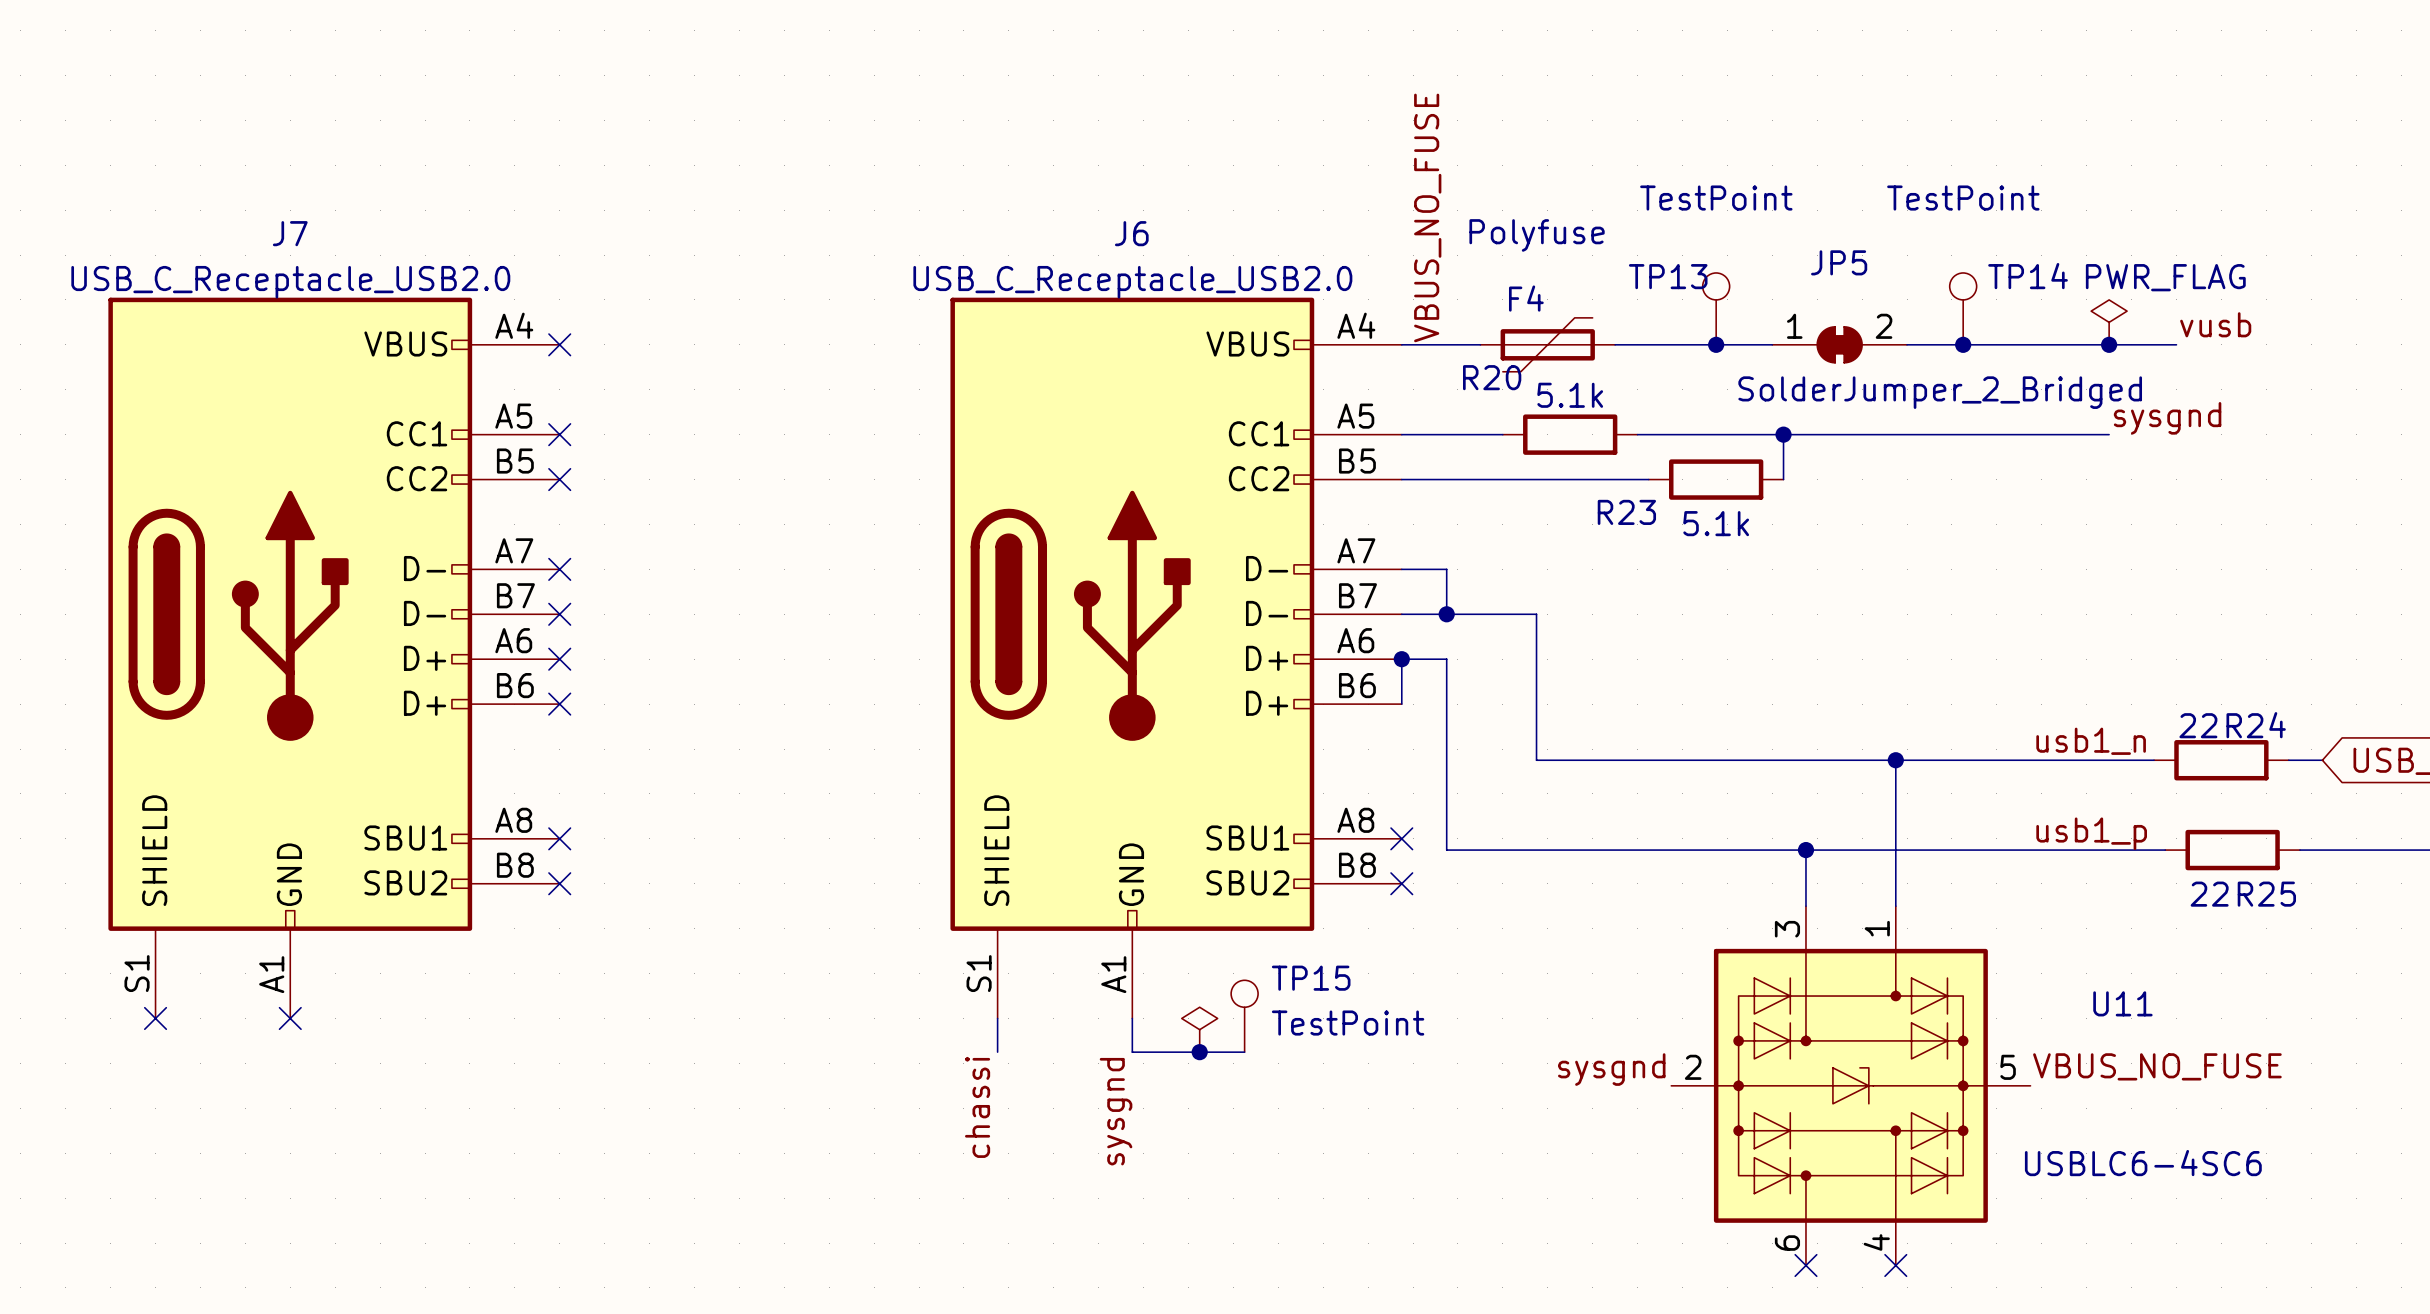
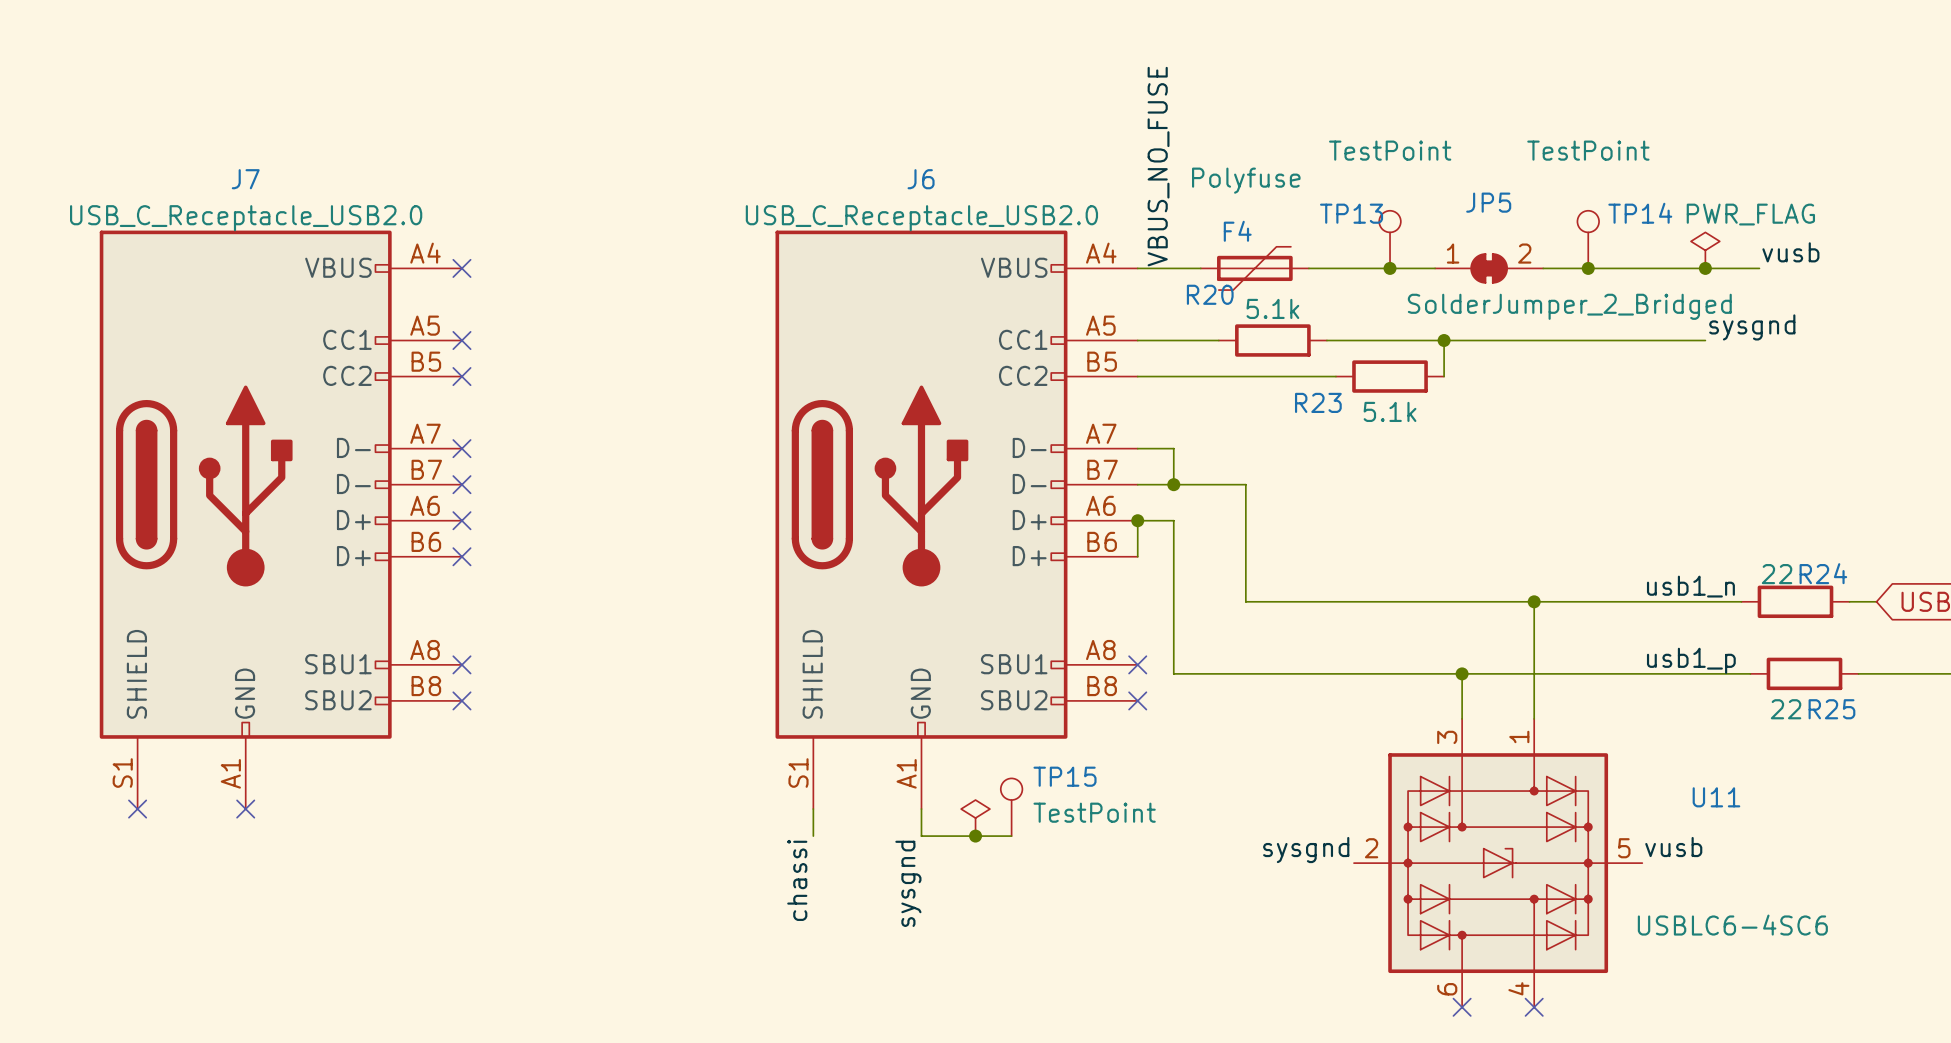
label: VBUS_NO_FUSE (2157, 1066) -> vusb (1673, 847)

